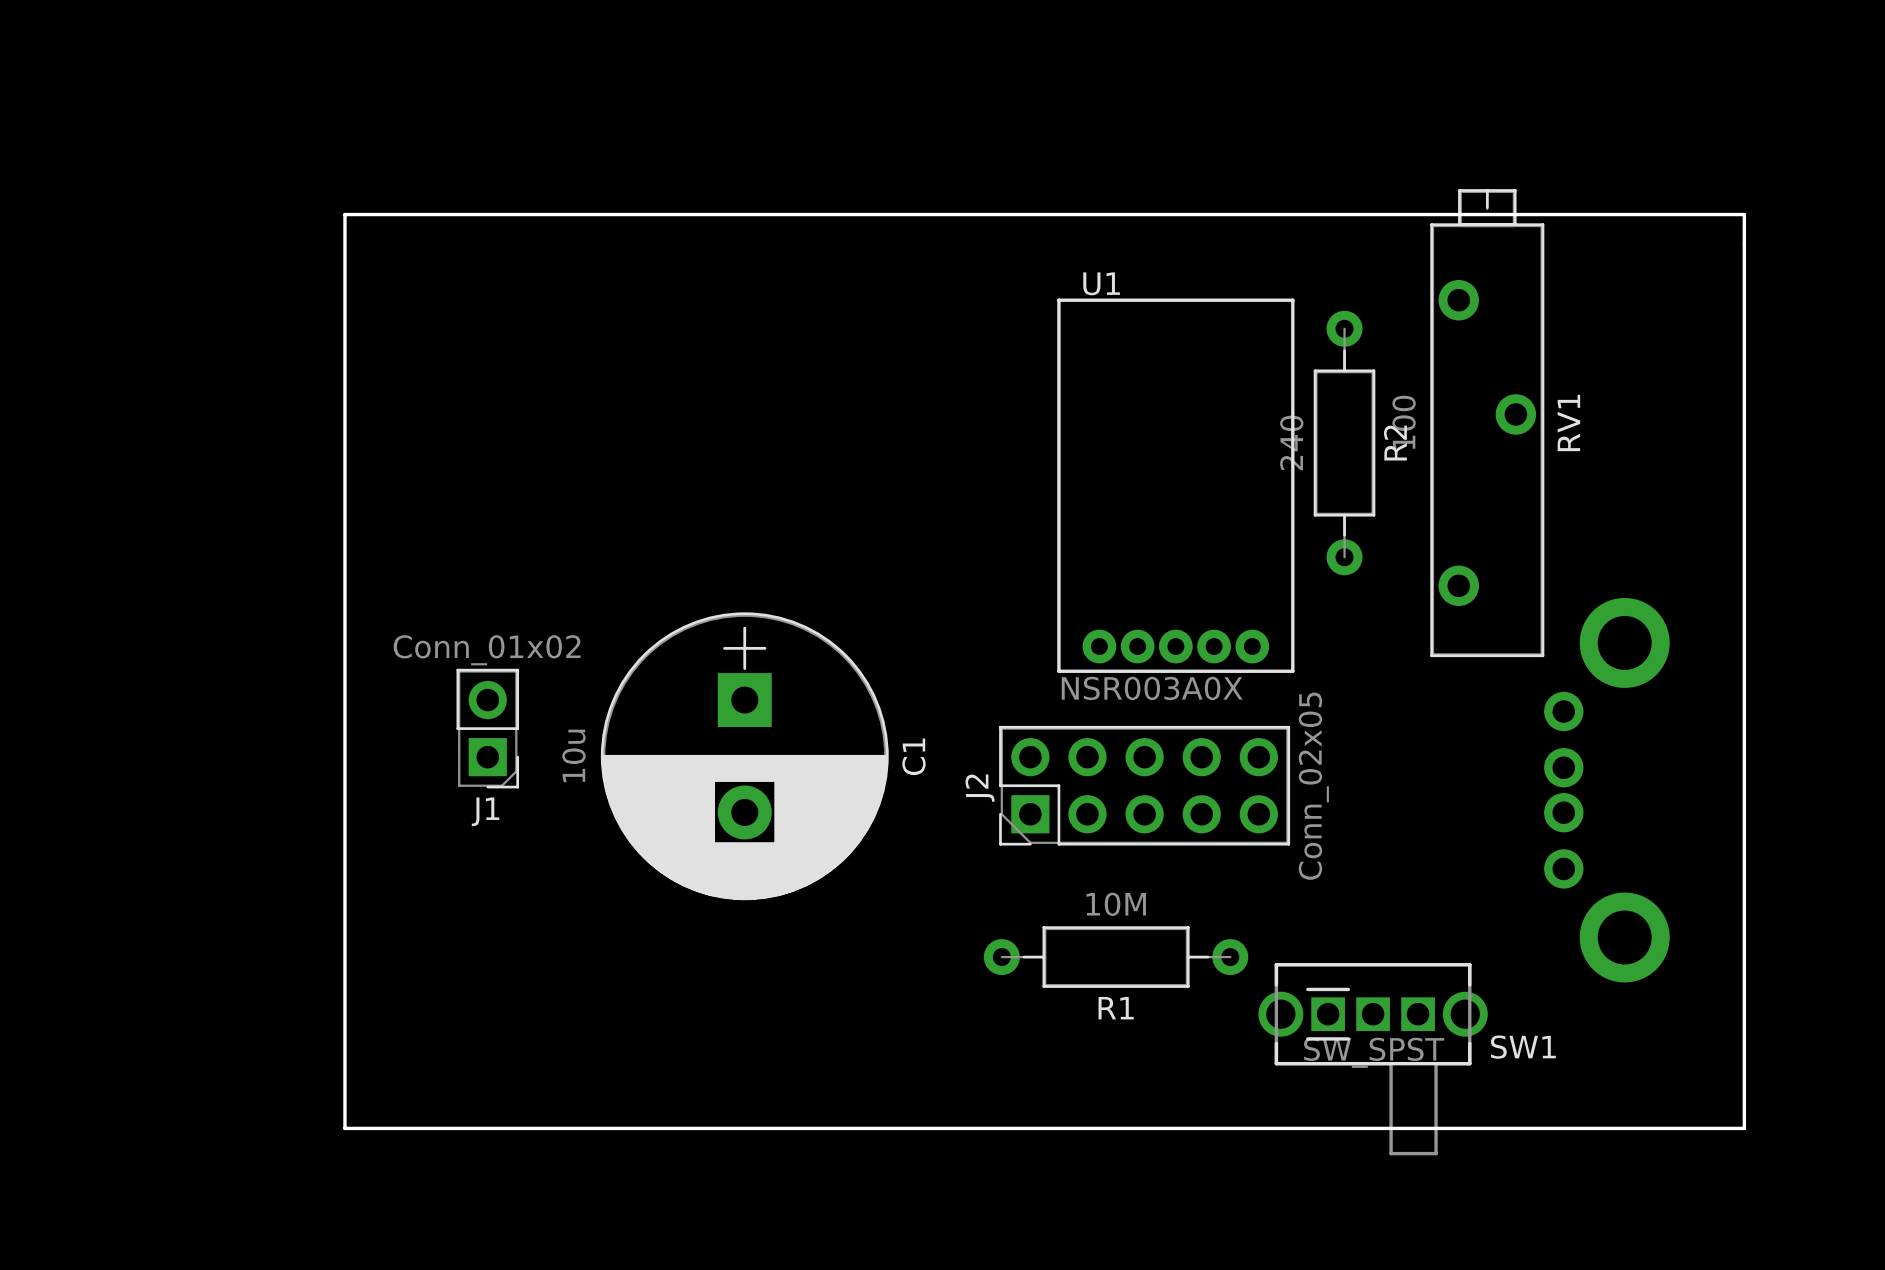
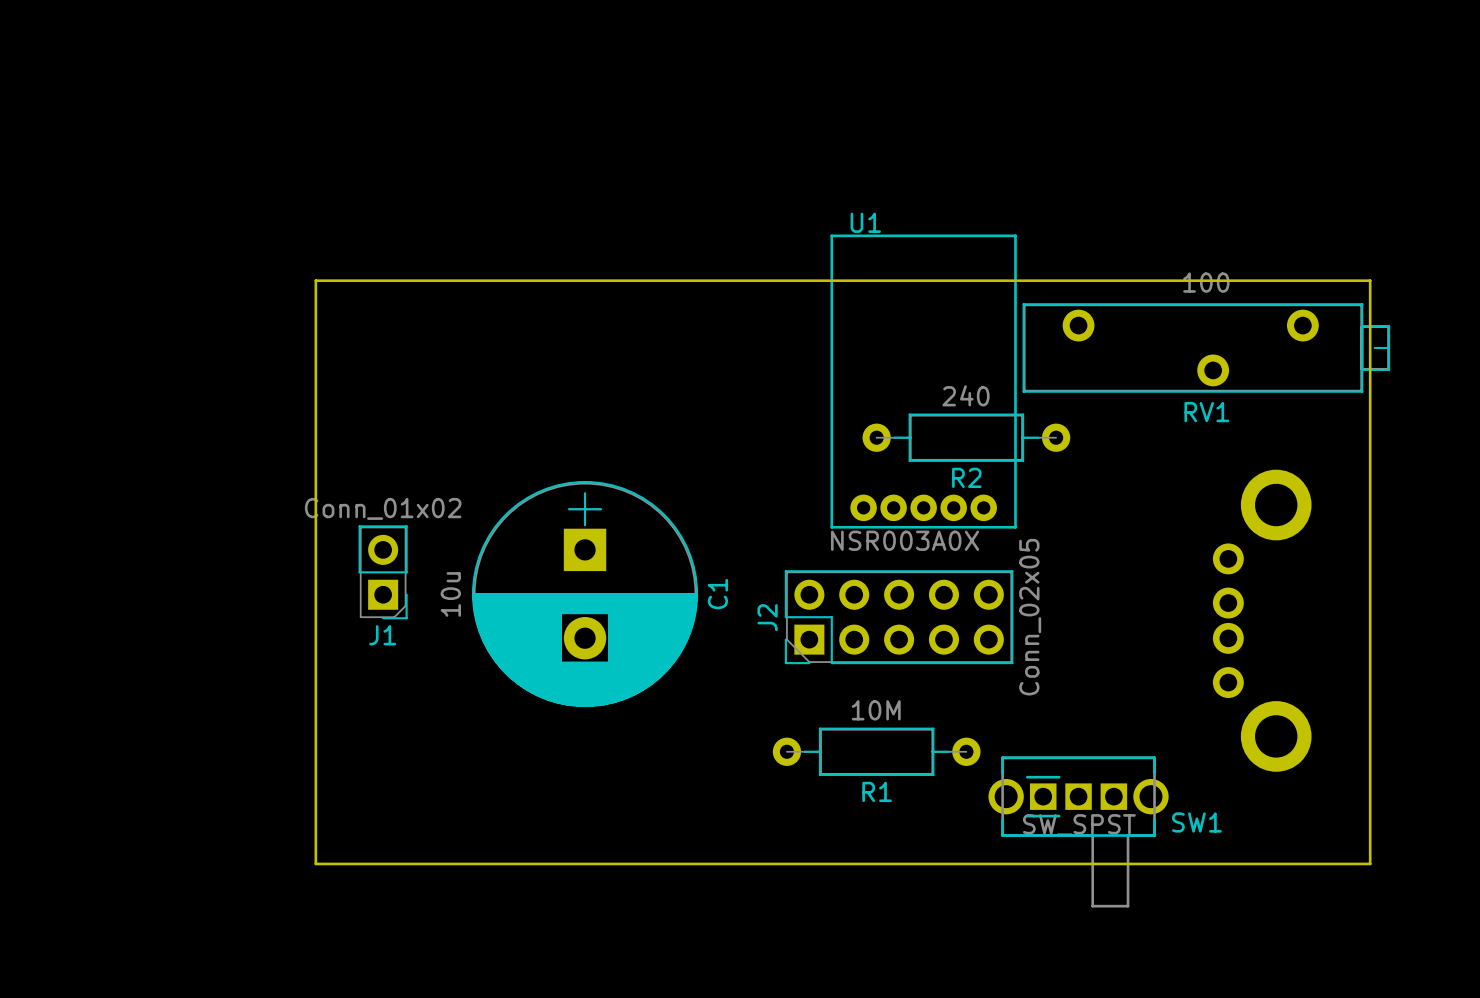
board edge: (1744, 357) (1744, 214) (344, 214) (344, 1128) (1744, 1128) (1744, 1099) -> (1370, 280) (315, 280) (315, 863) (1370, 863)
RV1 rotation: 0° (1487, 423) -> 90° clockwise (1206, 347)
R2 rotation: 0° (1344, 443) -> 90° clockwise (966, 437)
R2 position: (1344, 443) -> (966, 437)

